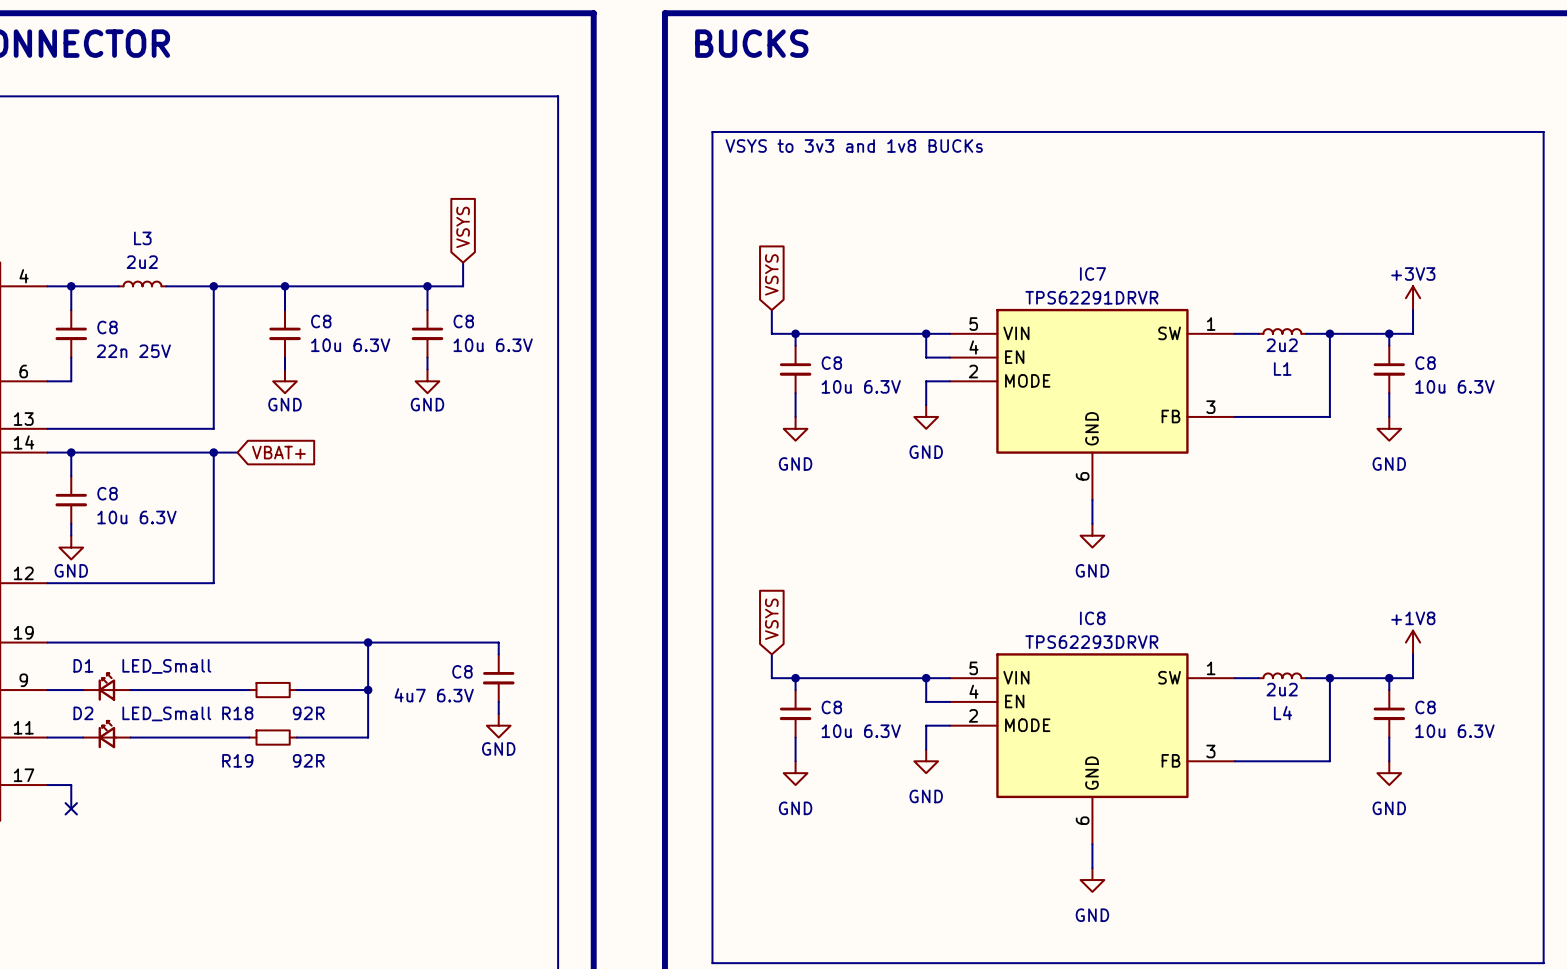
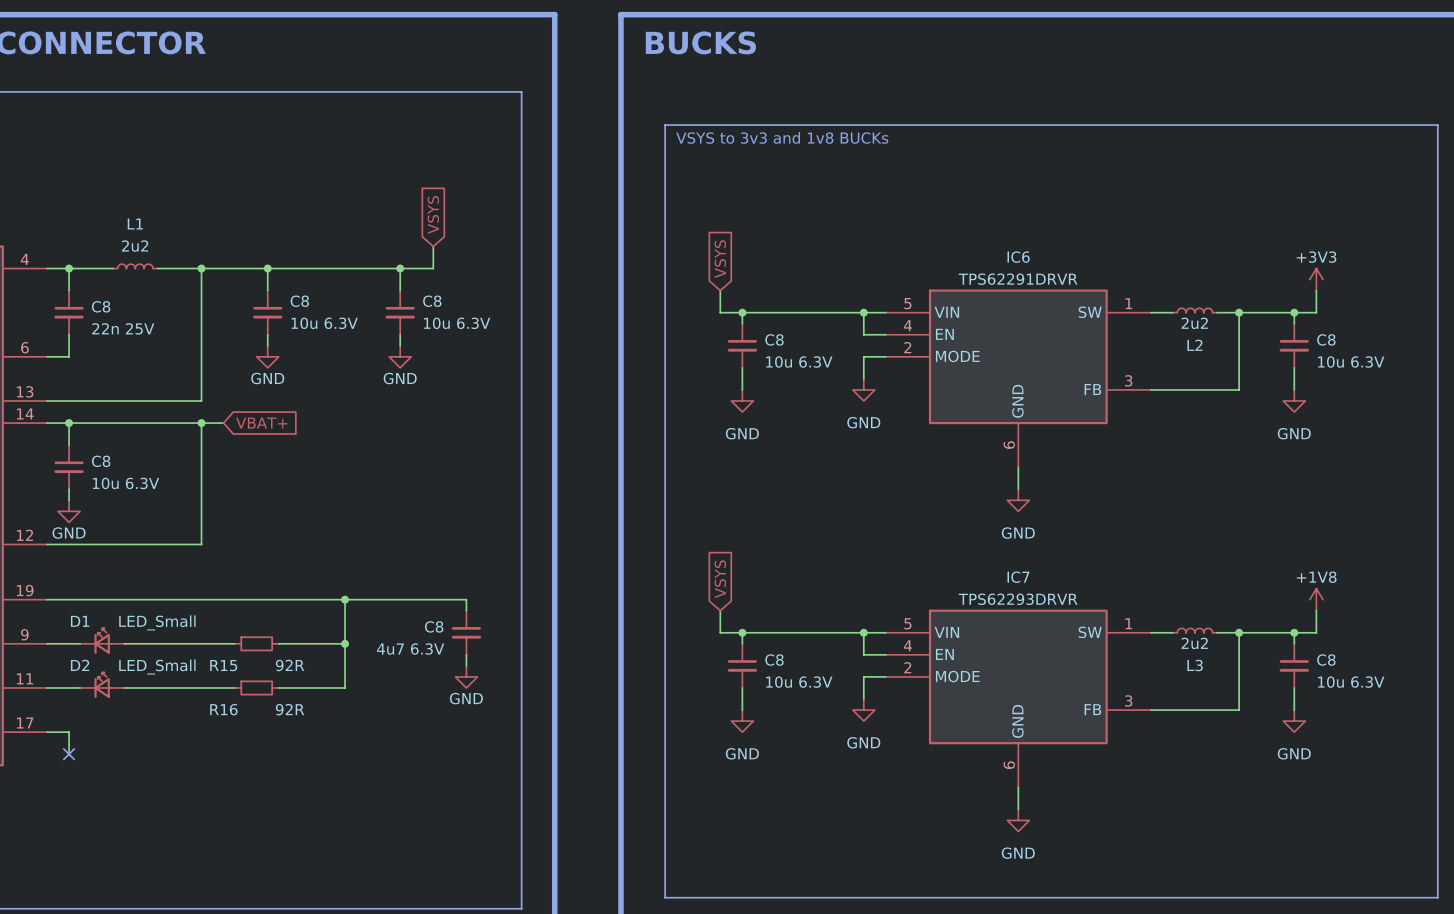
L3 name: L3 (142, 238) -> L1 (135, 223)
IC7 name: IC7 (1093, 274) -> IC6 (1018, 257)
L1 name: L1 (1282, 369) -> L2 (1194, 345)
IC8 name: IC8 (1092, 618) -> IC7 (1018, 577)
R18 name: R18 (237, 713) -> R15 (223, 665)
L4 name: L4 (1282, 713) -> L3 (1195, 665)
R19 name: R19 (237, 760) -> R16 (223, 709)

